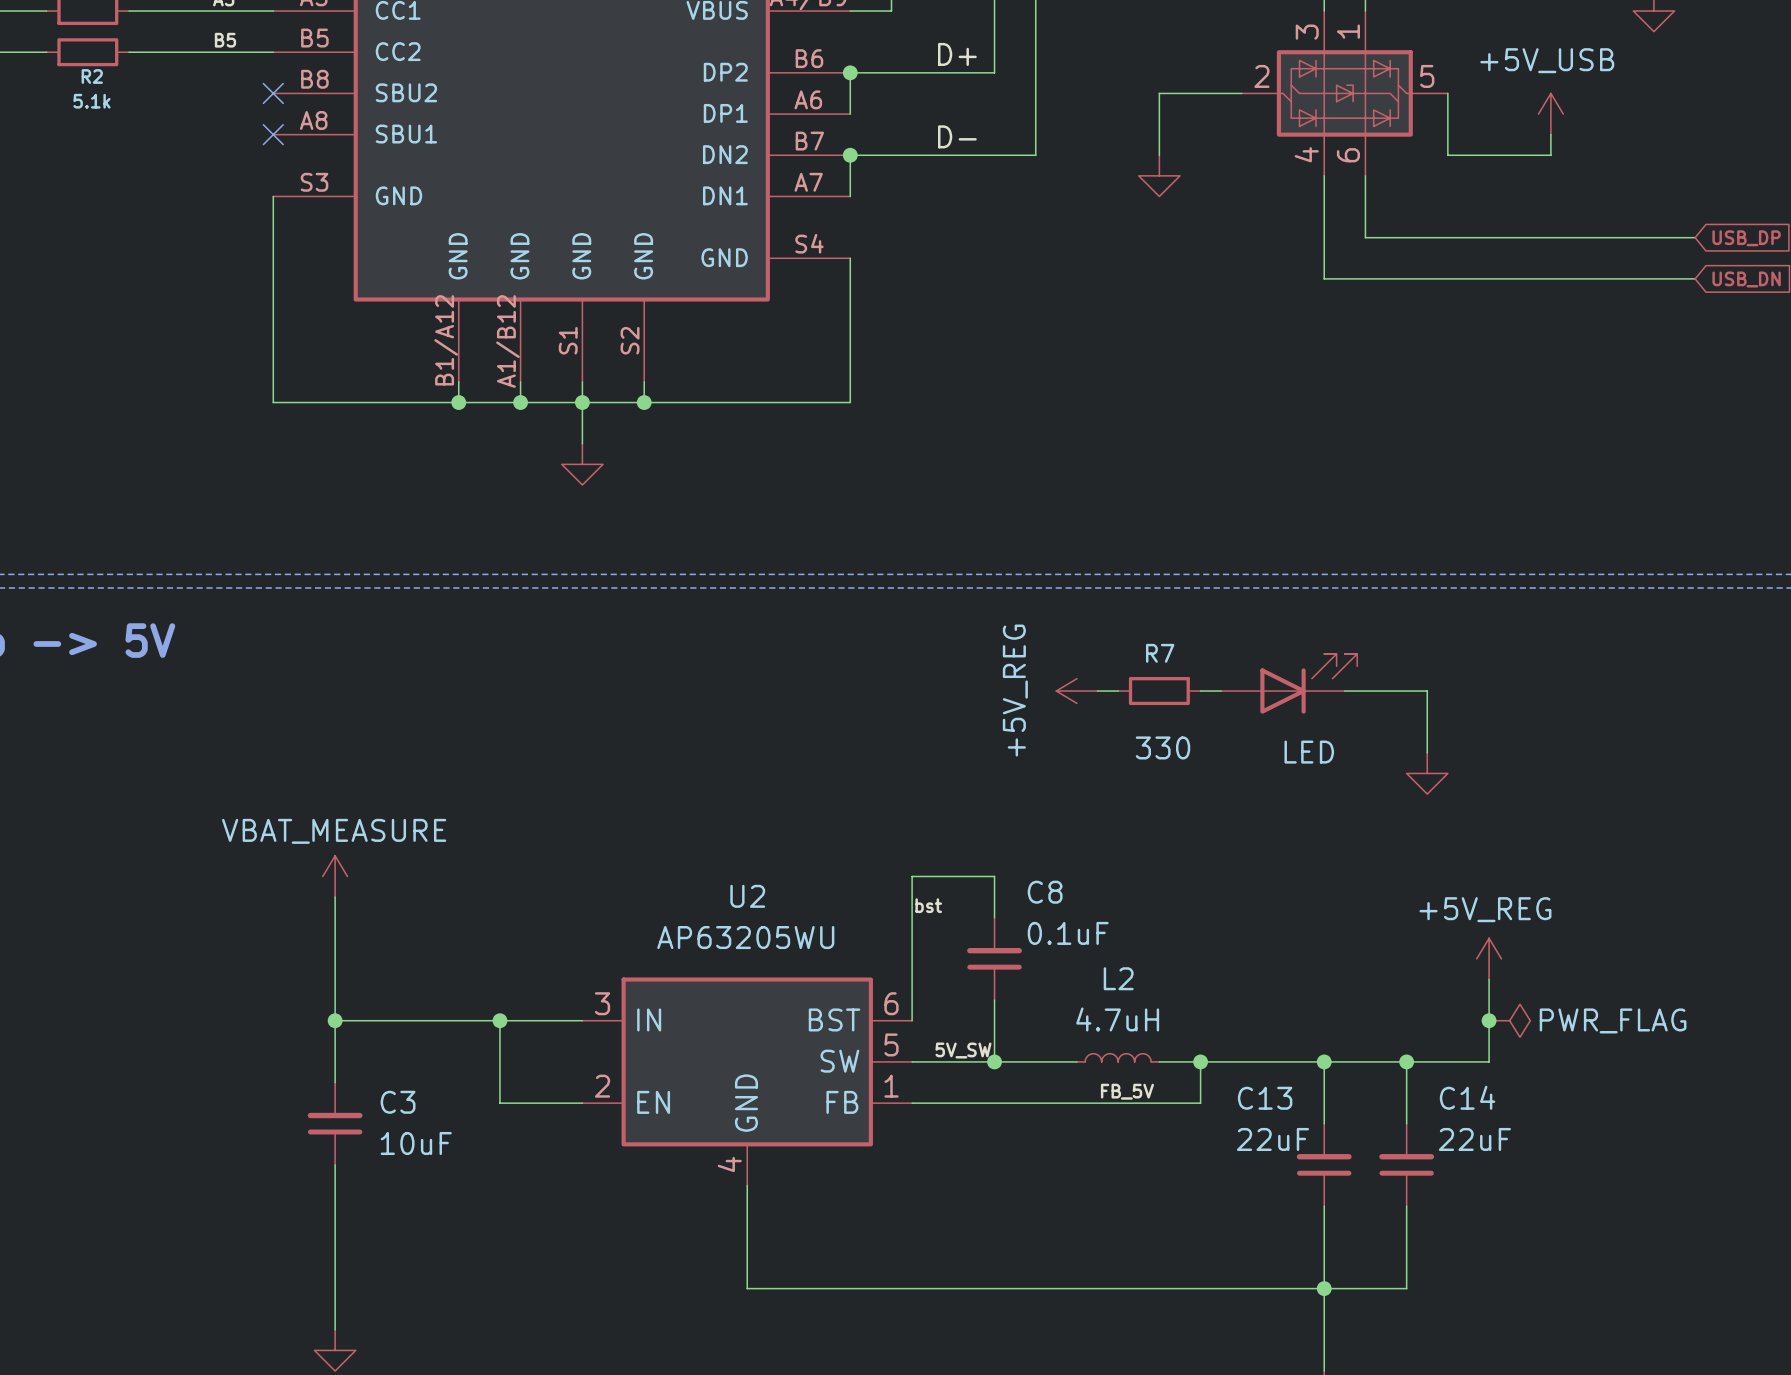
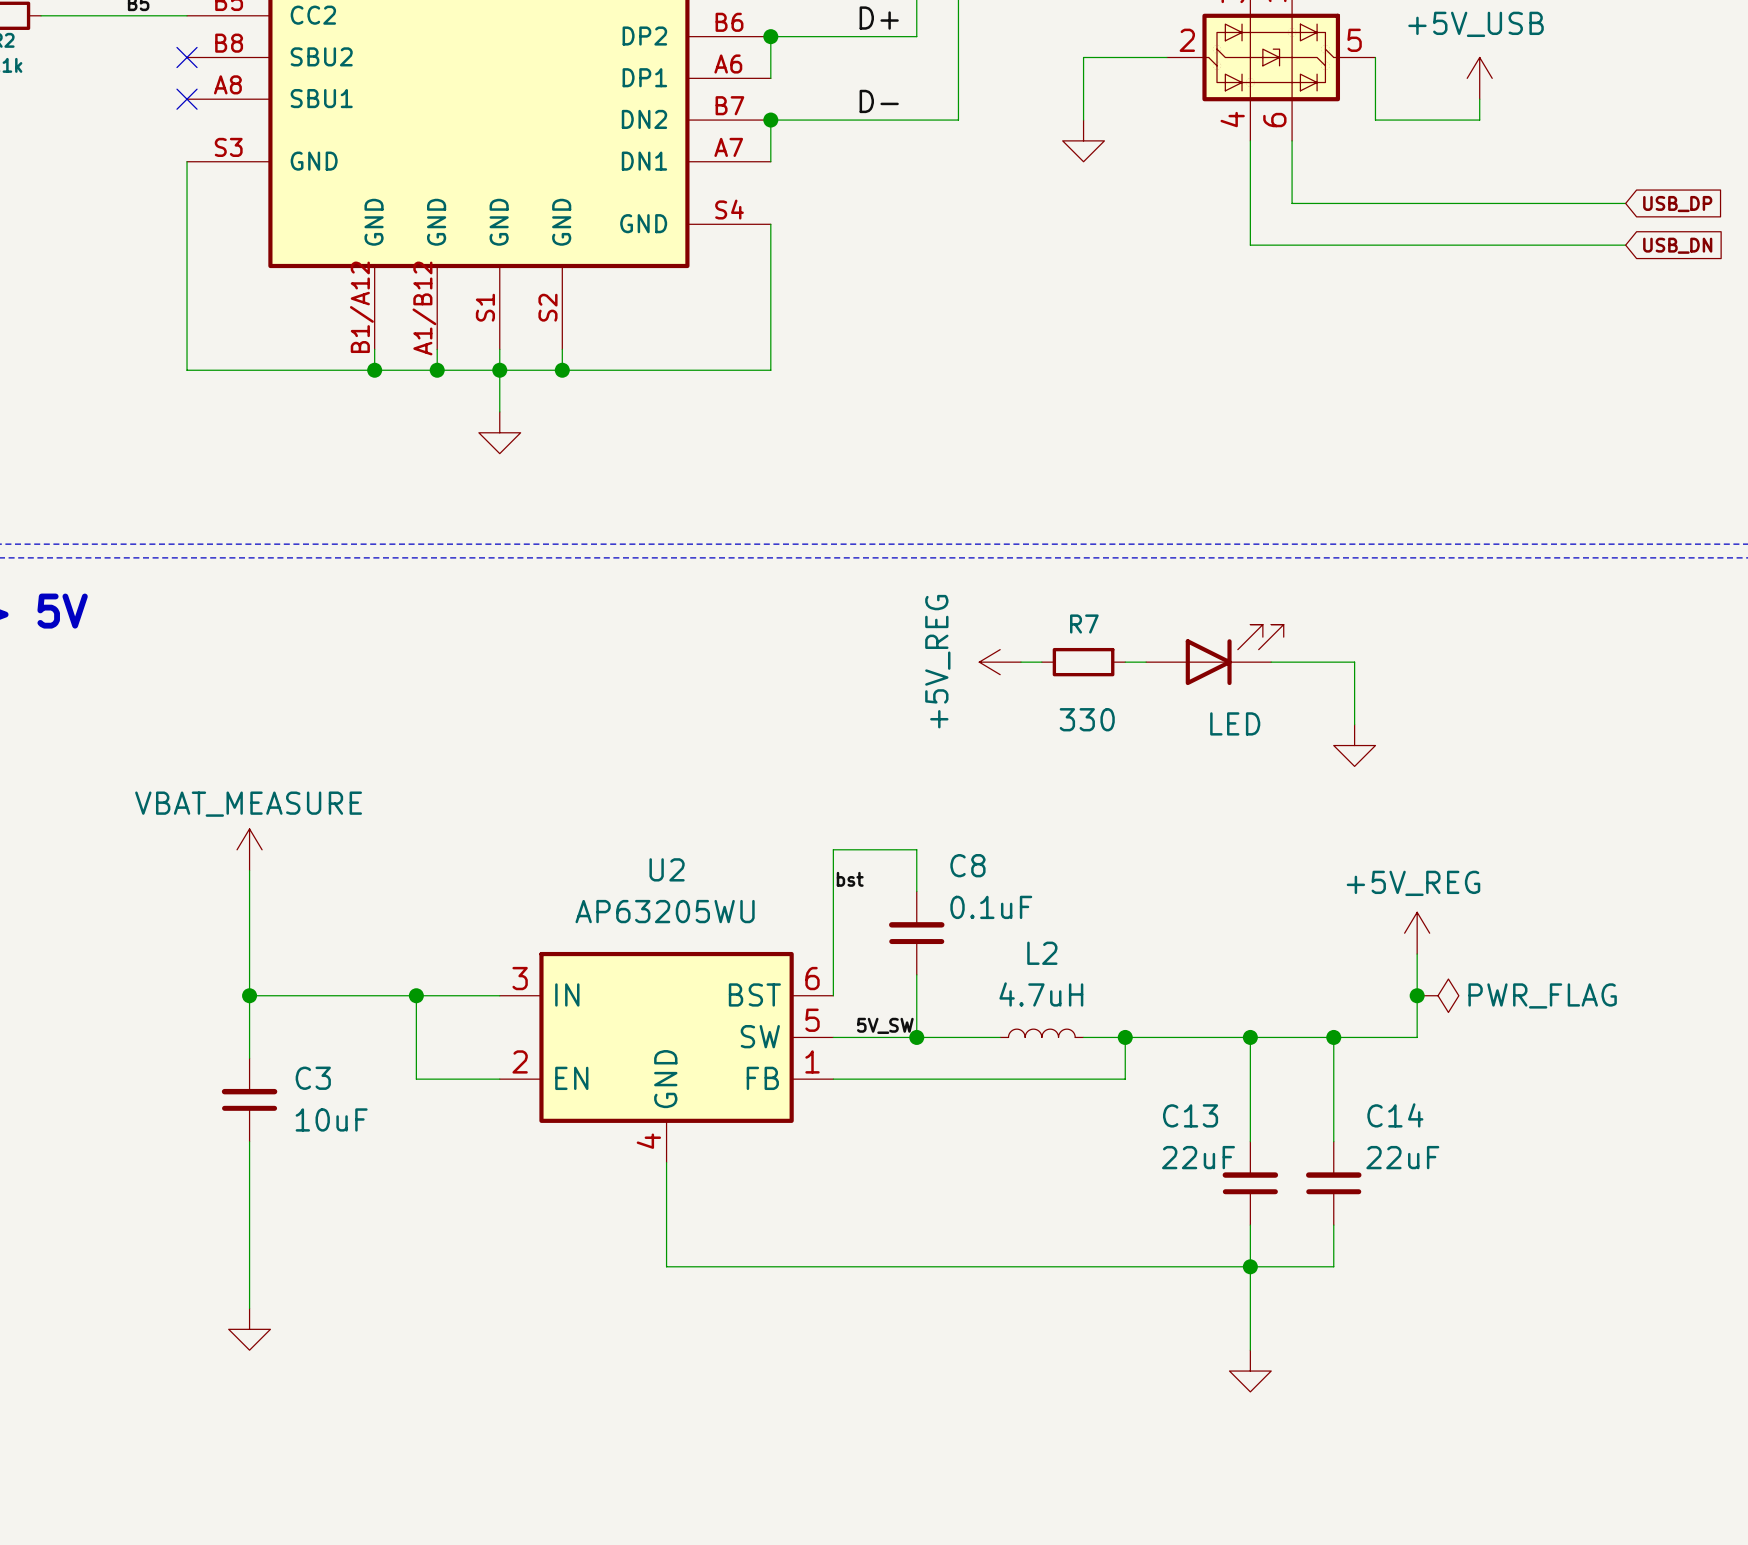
label: FB_5V (1127, 1091) -> none
C13 position: (1324, 1164) -> (1250, 1183)
C14 position: (1406, 1164) -> (1333, 1183)

